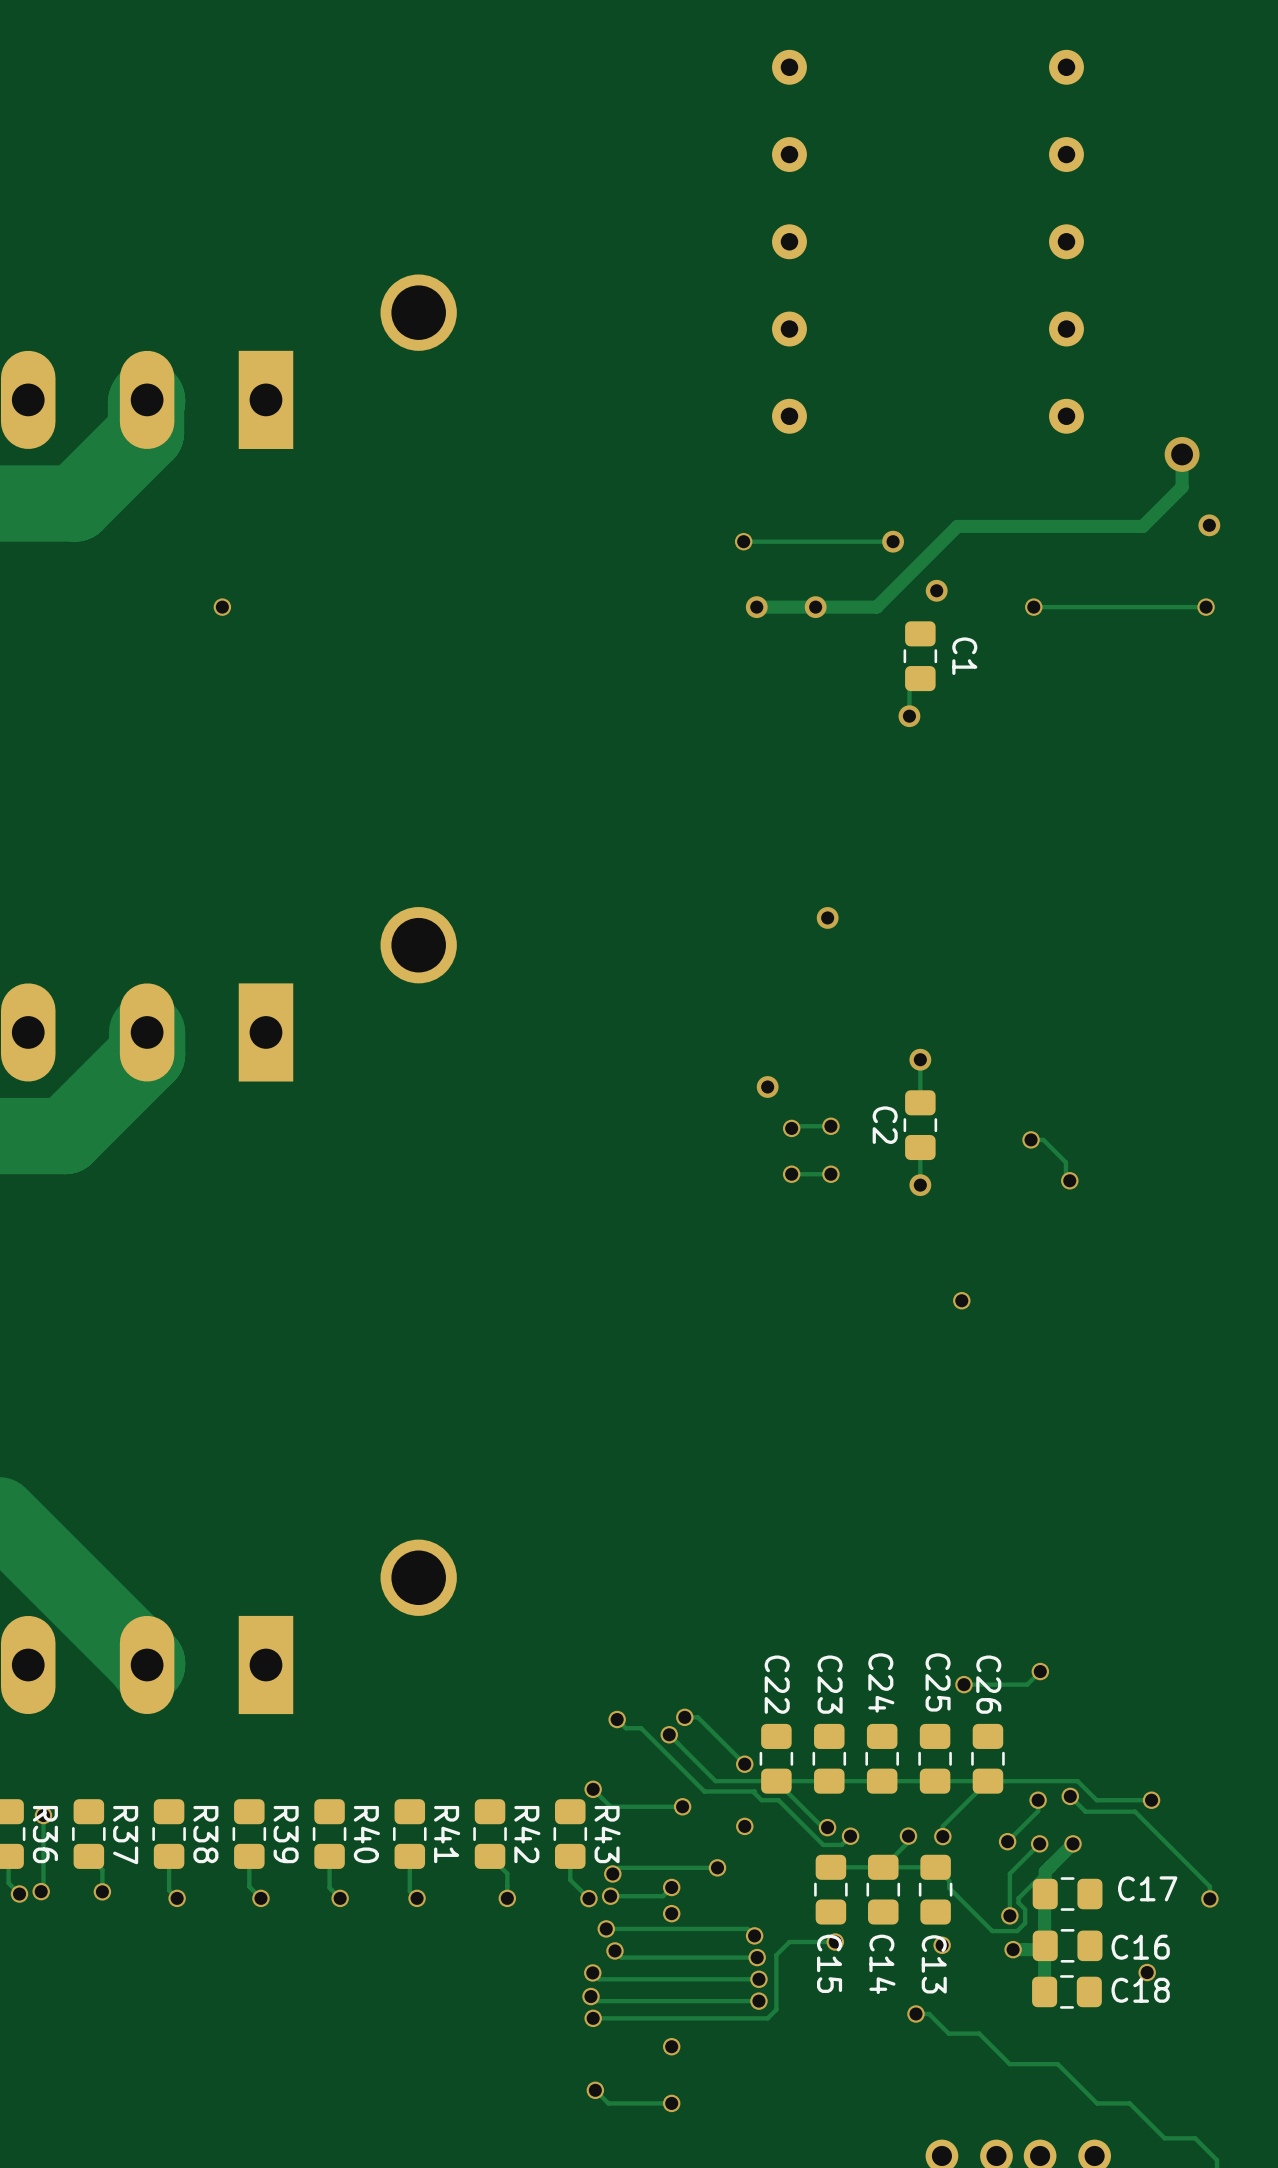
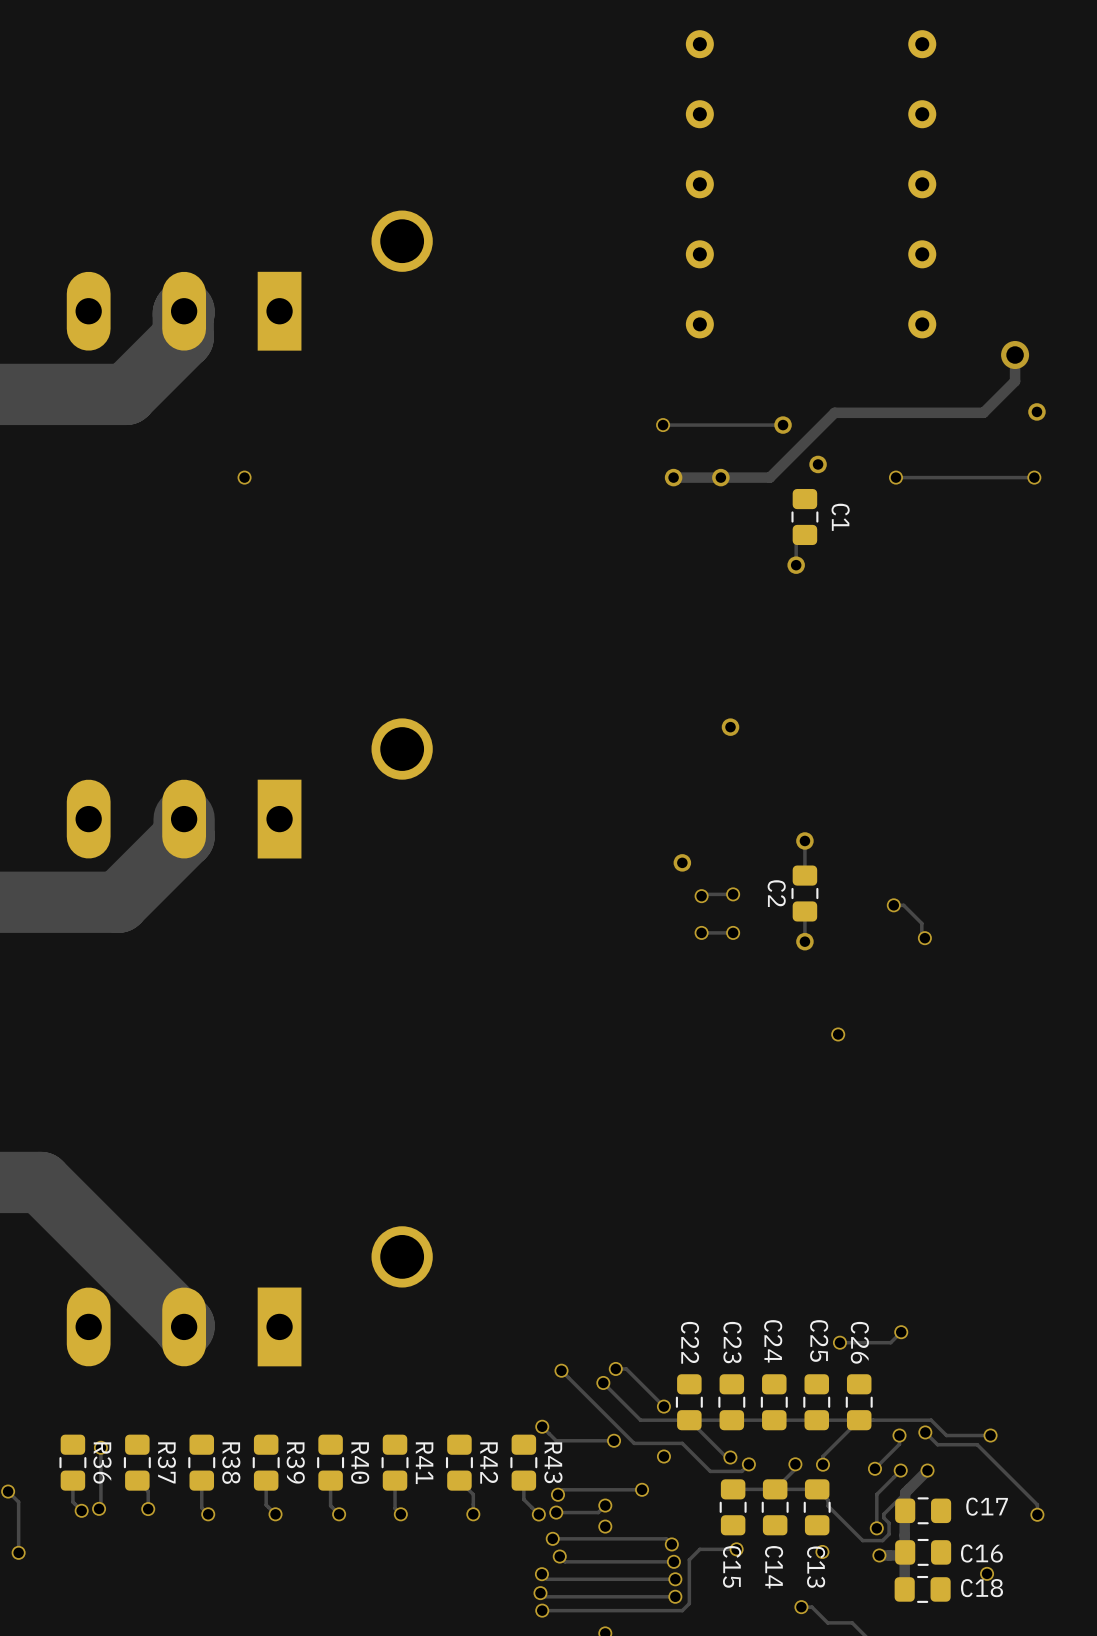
track: (625, 1728) (641, 1728) (704, 1791) (754, 1791) (761, 1800) (778, 1800) (823, 1844) -> (568, 1377) (634, 1443) (682, 1443) (710, 1471) (727, 1471)

